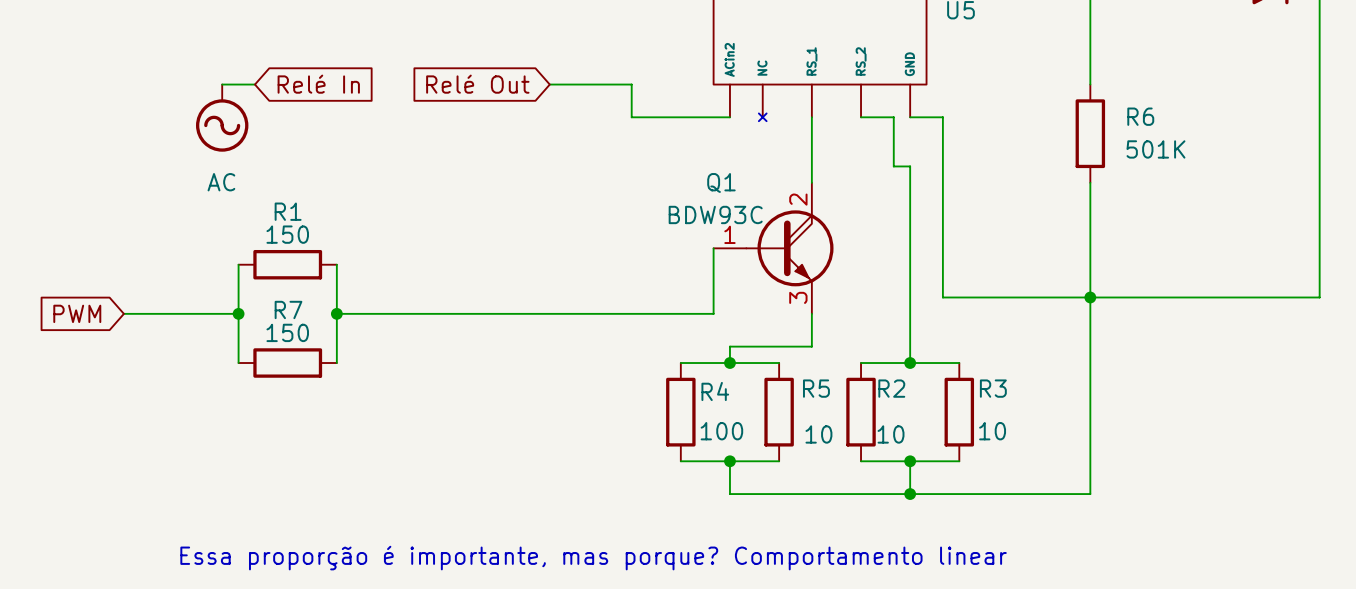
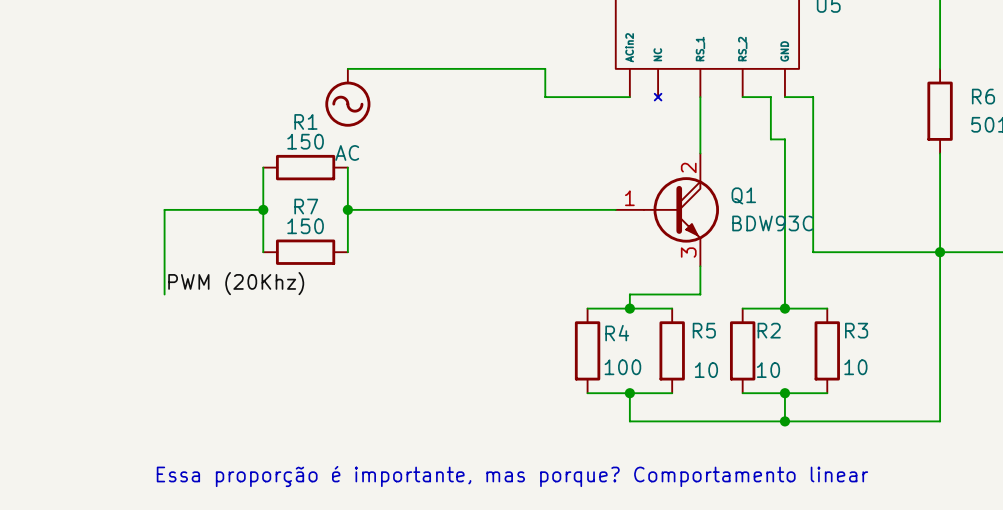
wire: (222, 84) (254, 84) -> none
global label: Relé In (318, 84) -> none
wire: none -> (347, 68) (474, 68)
global label: Relé Out (477, 84) -> none
power symbol position: AC (222, 118) -> AC (347, 97)
Q1 name position: Q1 (721, 182) -> Q1 (743, 195)
Q1 value position: BDW93C (715, 214) -> BDW93C (772, 223)
wire: none -> (263, 209) (164, 209) (164, 294)
junction: none -> (263, 209)
junction: none -> (347, 209)
wire: (713, 248) (713, 313) (336, 313) -> (615, 209) (347, 209)
wire: (238, 264) (238, 363) -> (263, 167) (263, 252)
R1 position: (287, 264) -> (305, 167)
wire: (336, 264) (336, 363) -> (347, 167) (347, 252)
global label: PWM (77, 313) -> none
wire: (123, 313) (238, 313) -> none
junction: (238, 313) -> none
junction: (336, 313) -> none
label: none -> PWM (20Khz) (236, 283)
R7 position: (287, 363) -> (305, 252)

